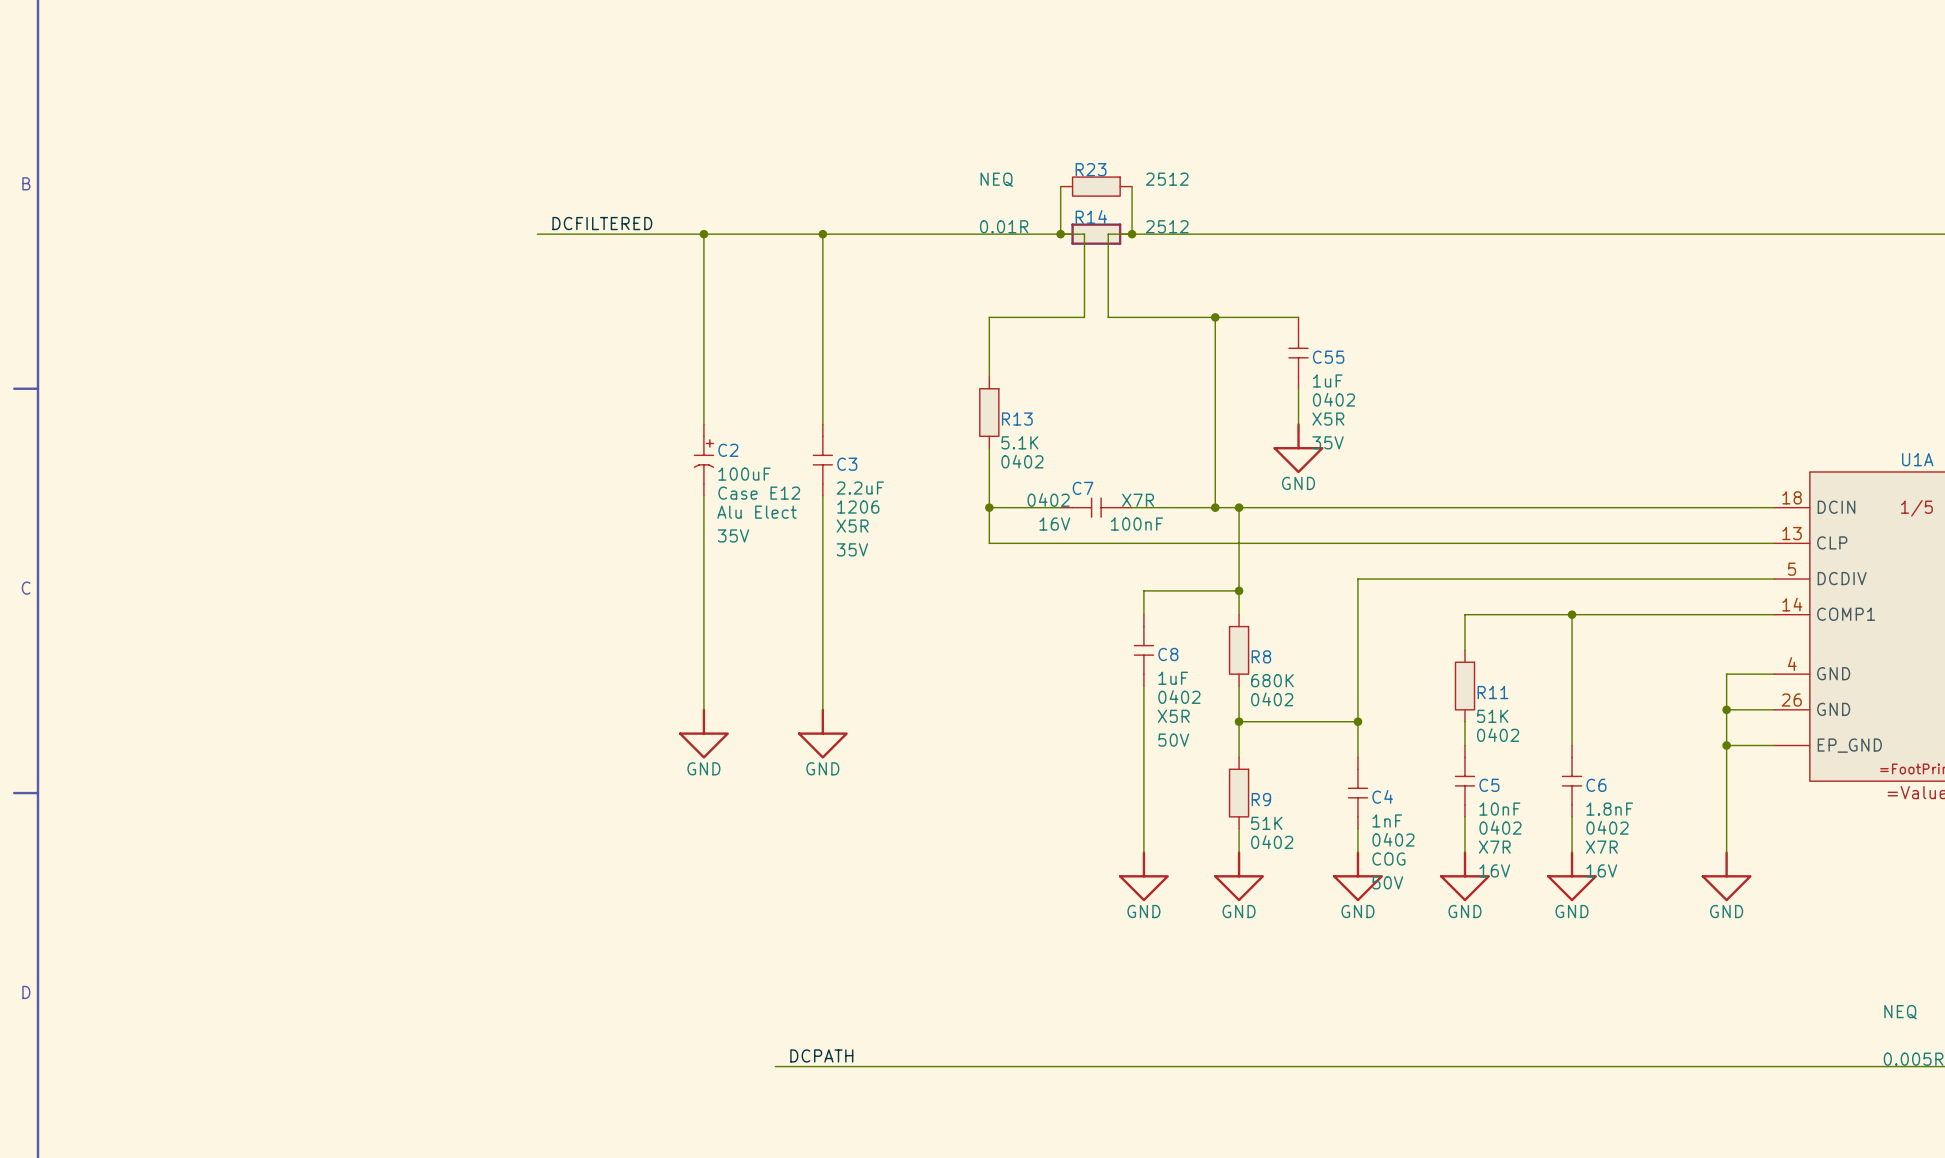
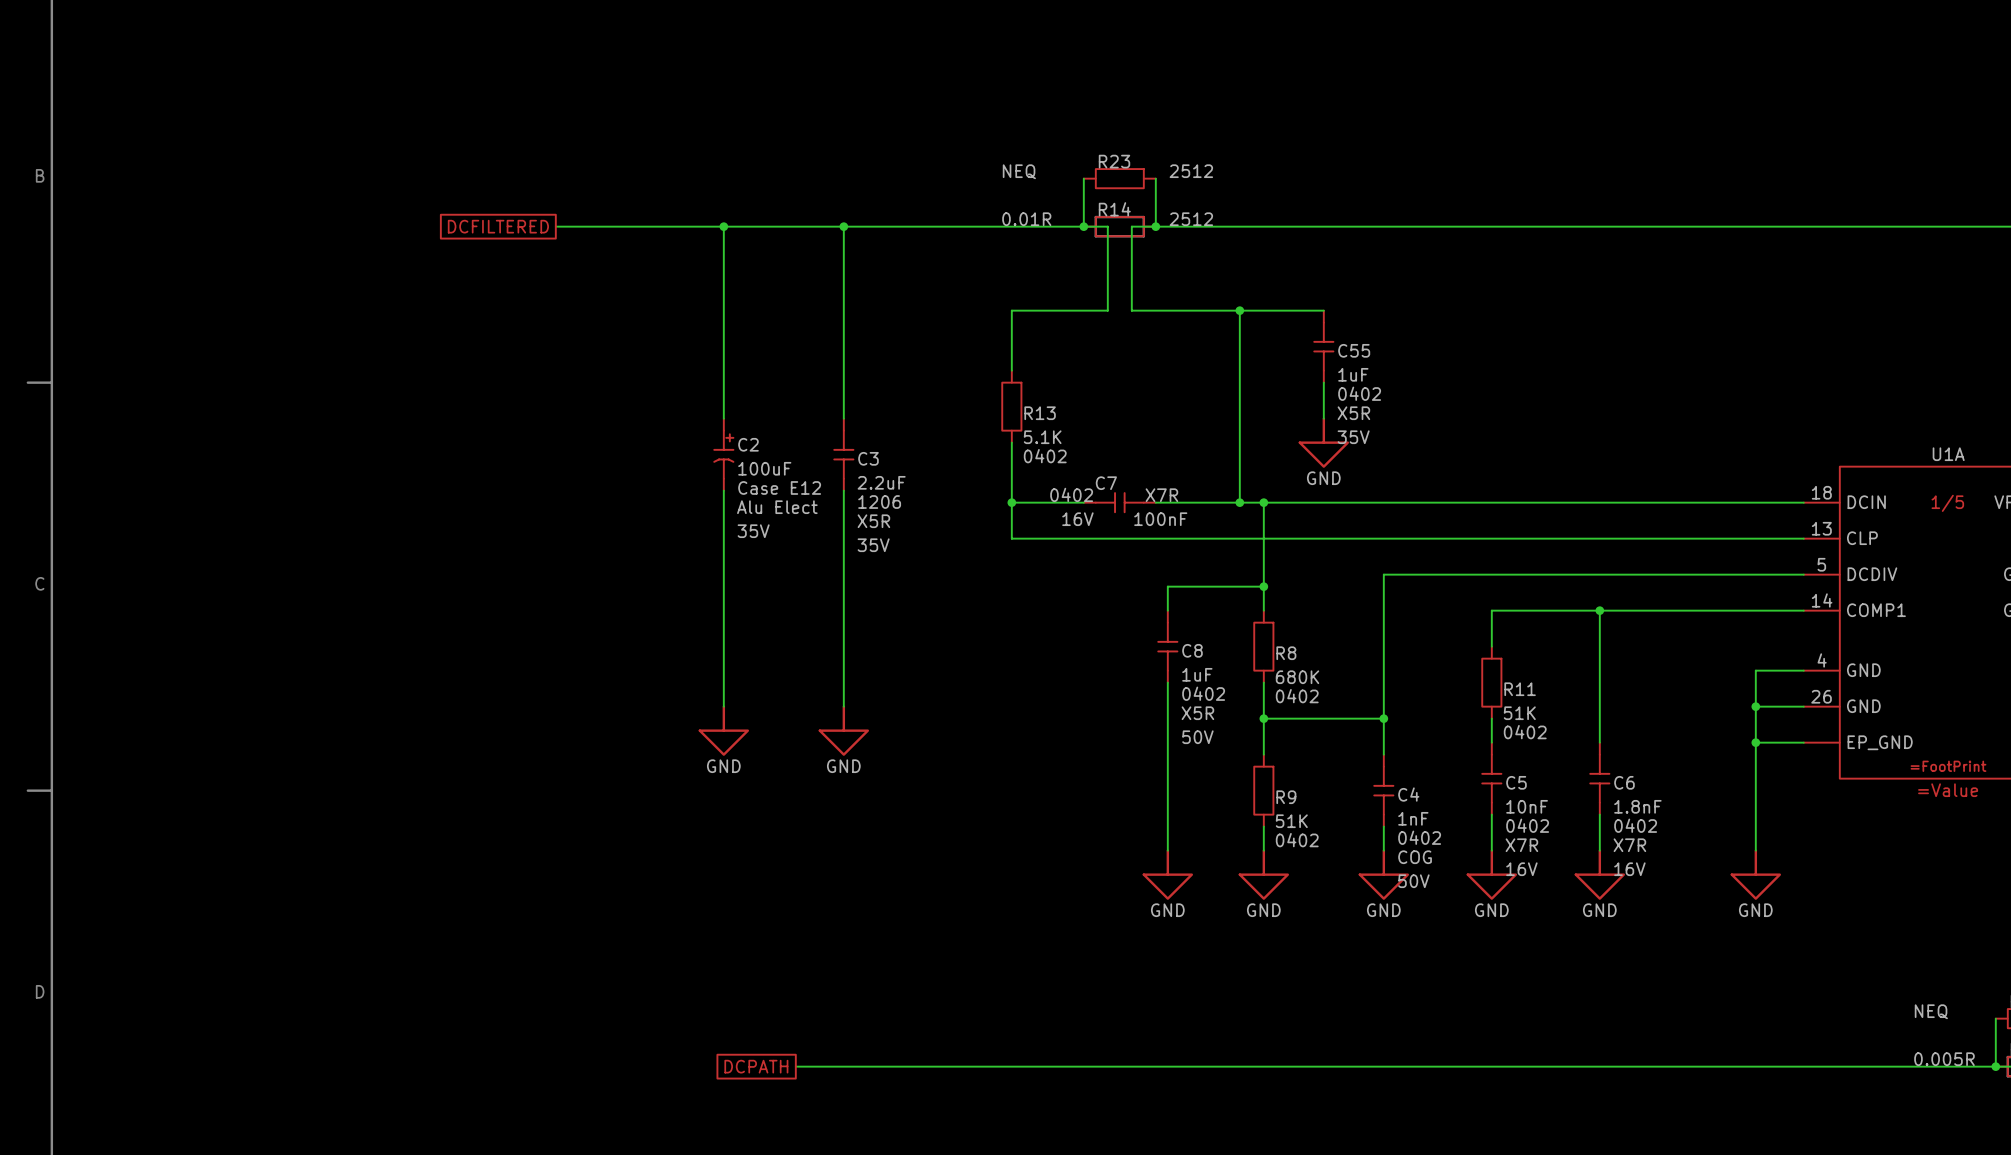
label: DCFILTERED (602, 223) -> none
global label: none -> DCFILTERED (498, 226)
label: DCPATH (821, 1055) -> none
global label: none -> DCPATH (756, 1066)

